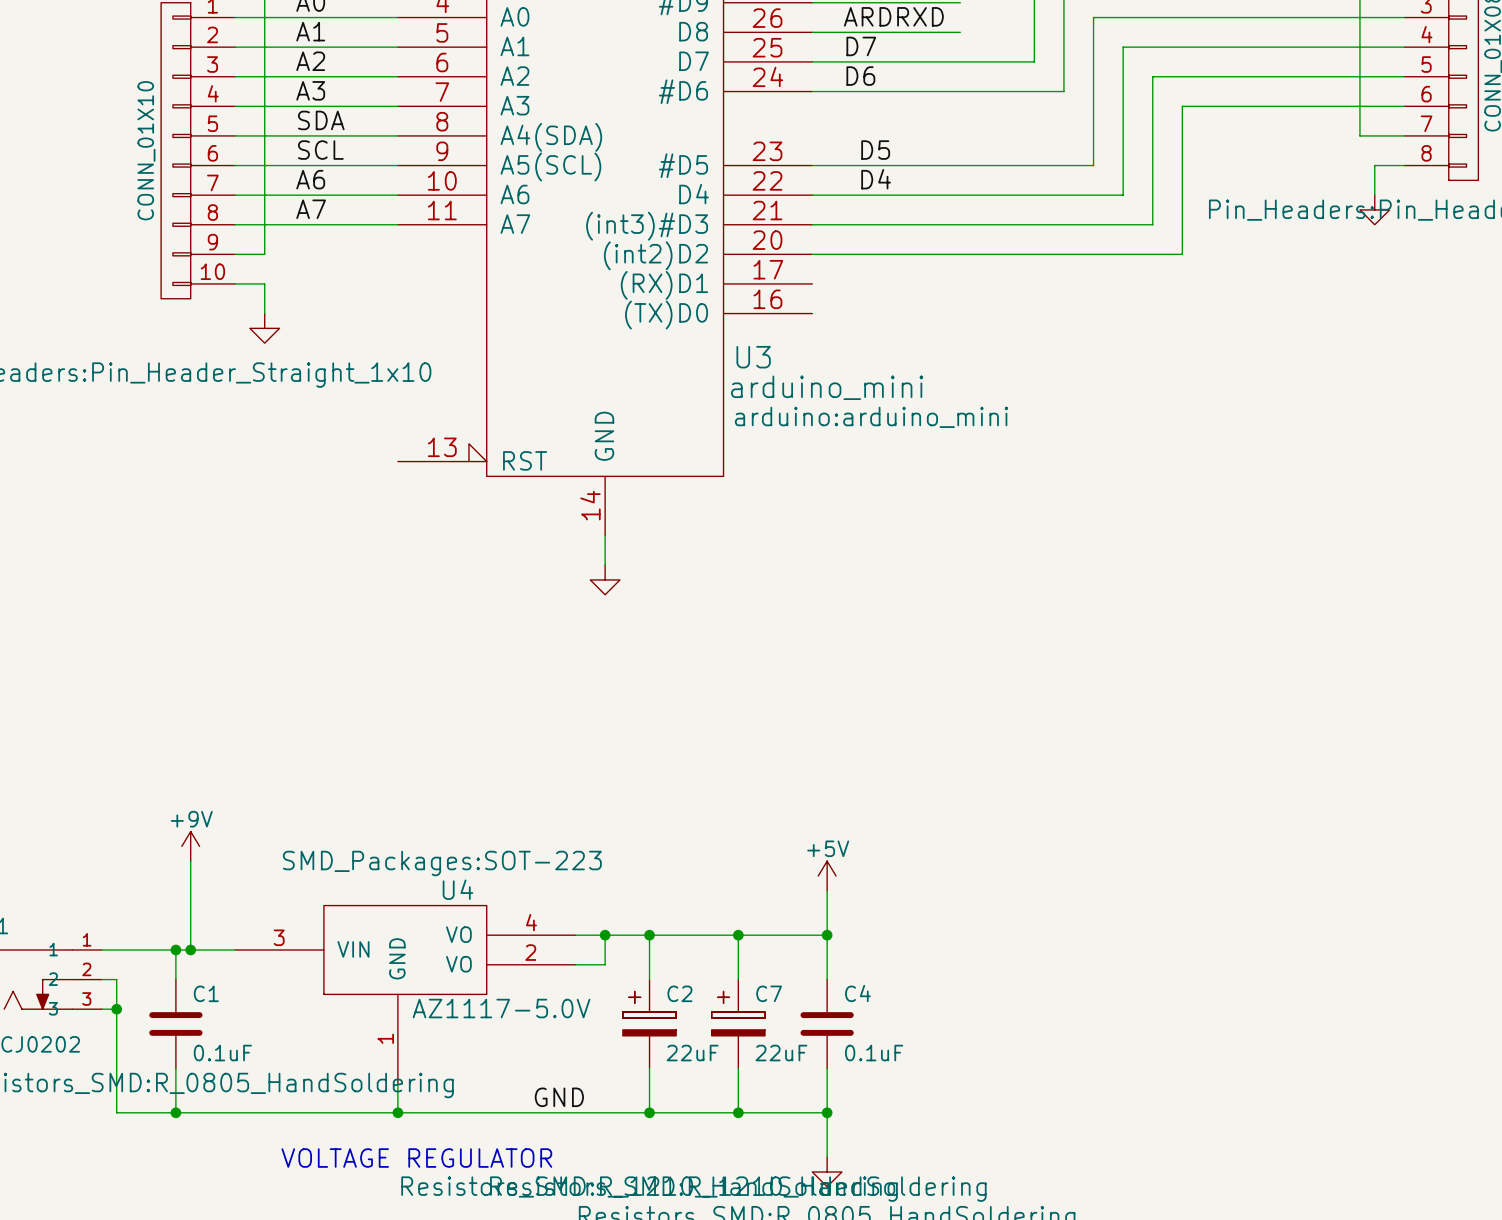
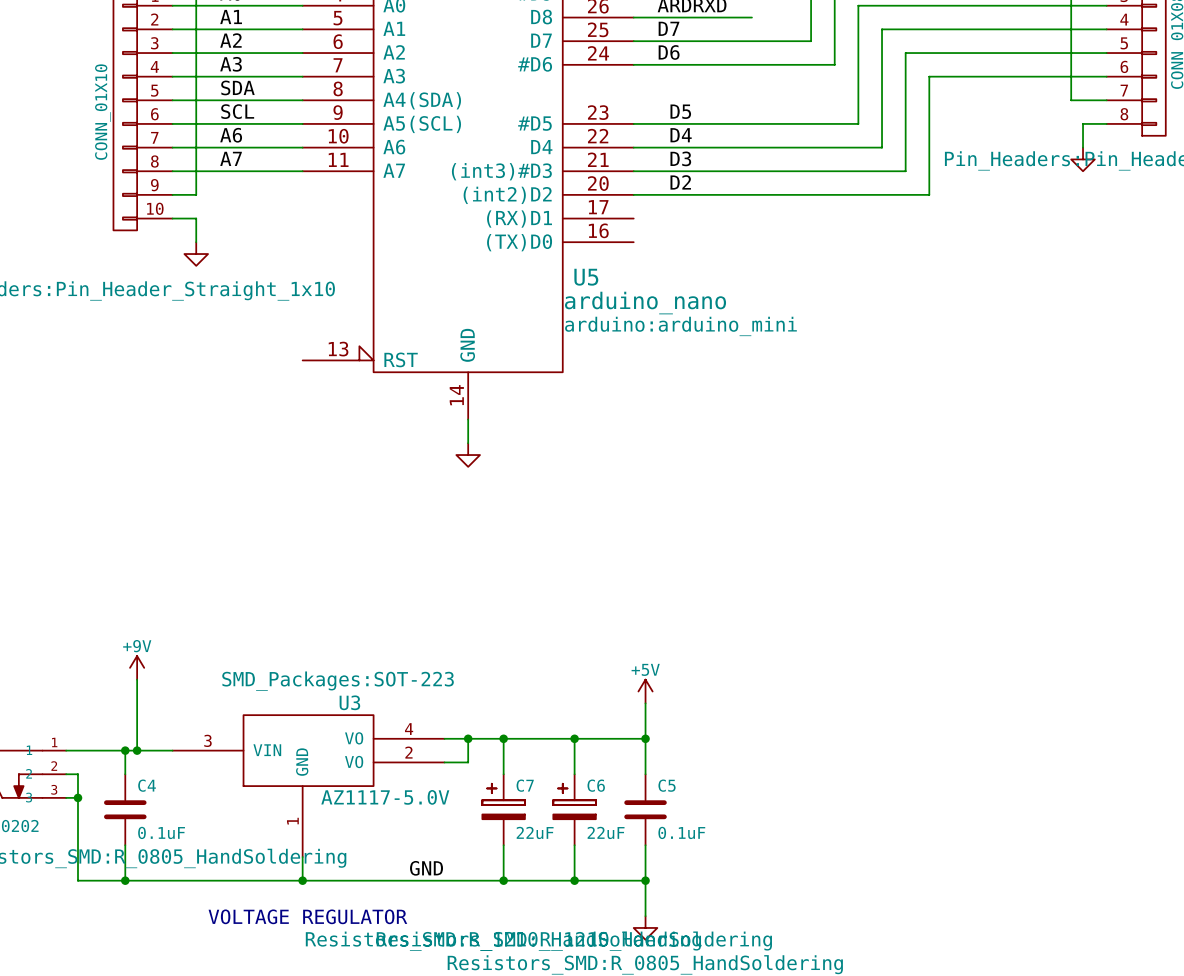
label: none -> D3 (680, 158)
label: none -> D2 (680, 182)
U3 name: U3 (753, 357) -> U5 (586, 277)
U3 value: arduino_mini (827, 387) -> arduino_nano (645, 303)
U4 name: U4 (457, 889) -> U3 (349, 702)
C1 name: C1 (206, 993) -> C4 (147, 785)
C2 name: C2 (679, 993) -> C7 (525, 785)
C7 name: C7 (769, 993) -> C6 (596, 785)
C4 name: C4 (857, 993) -> C5 (667, 785)

